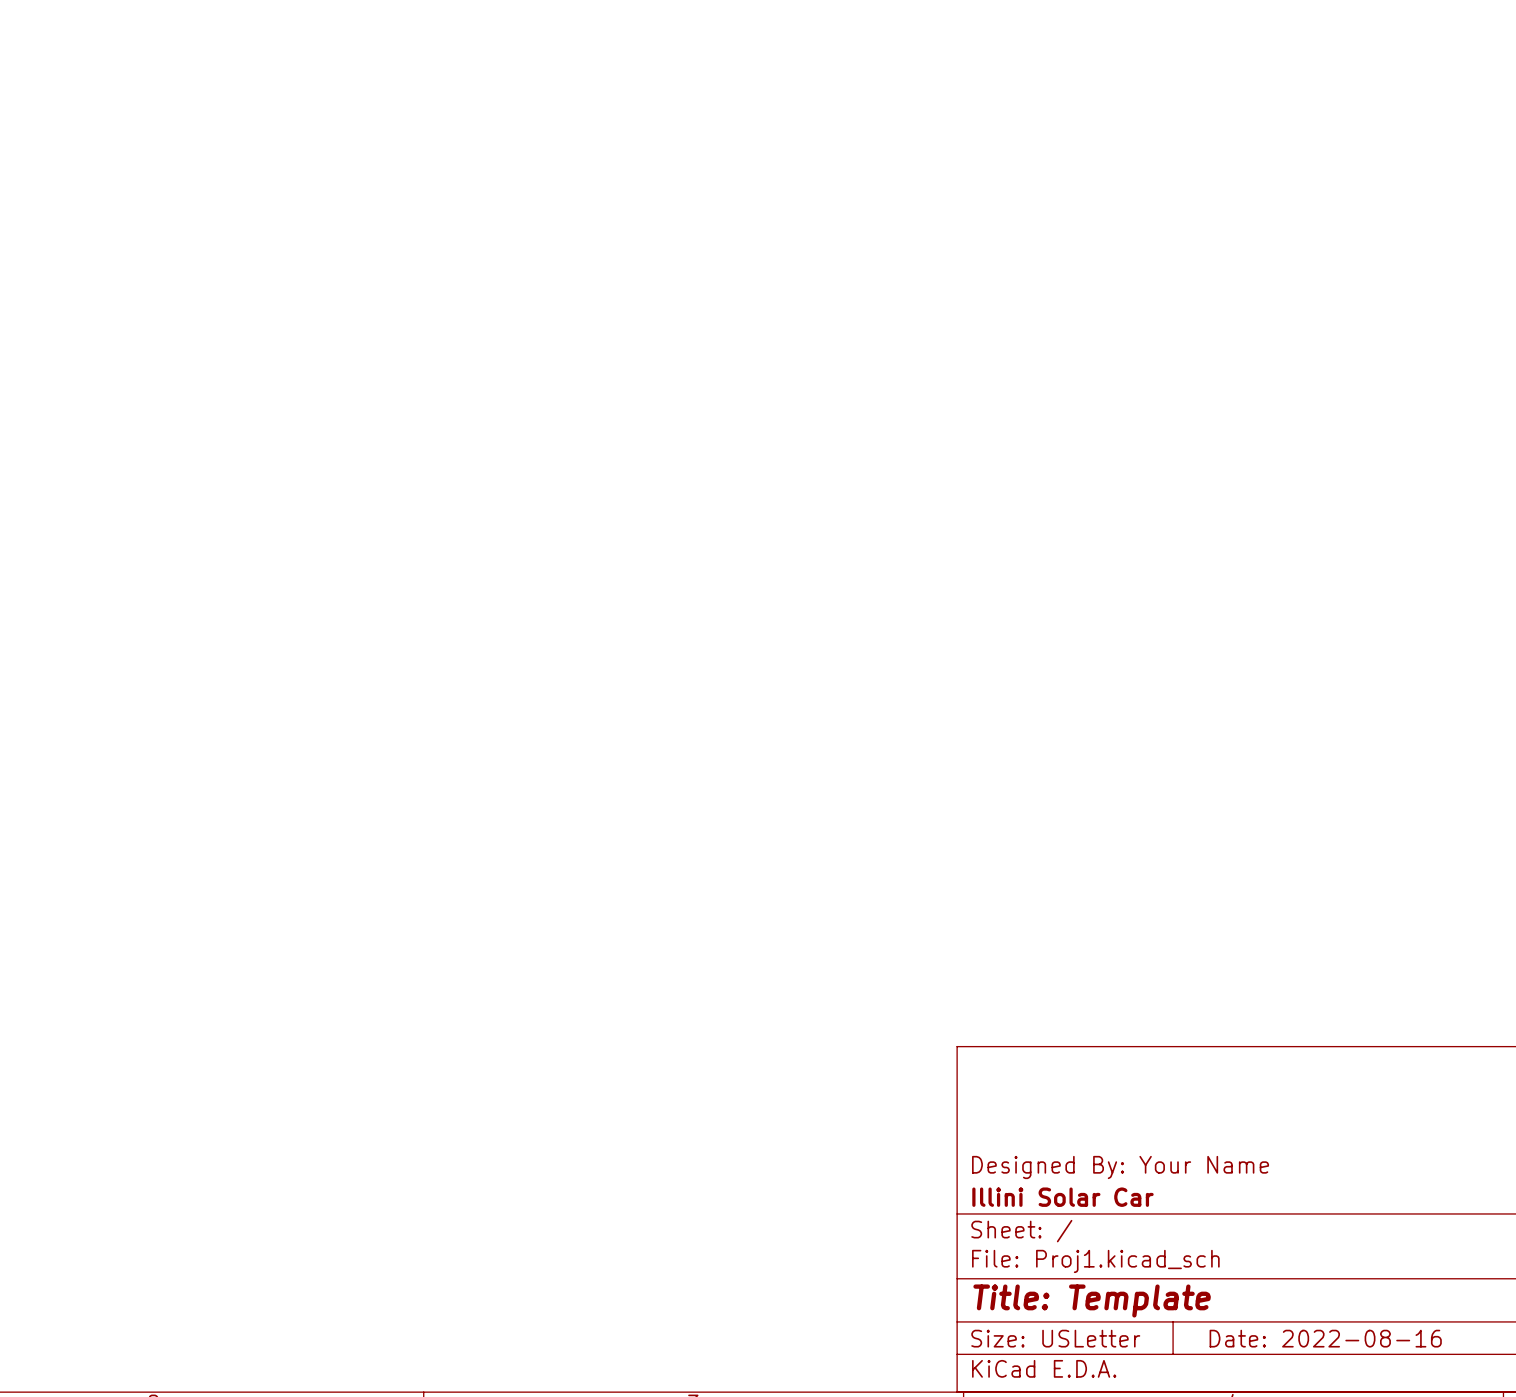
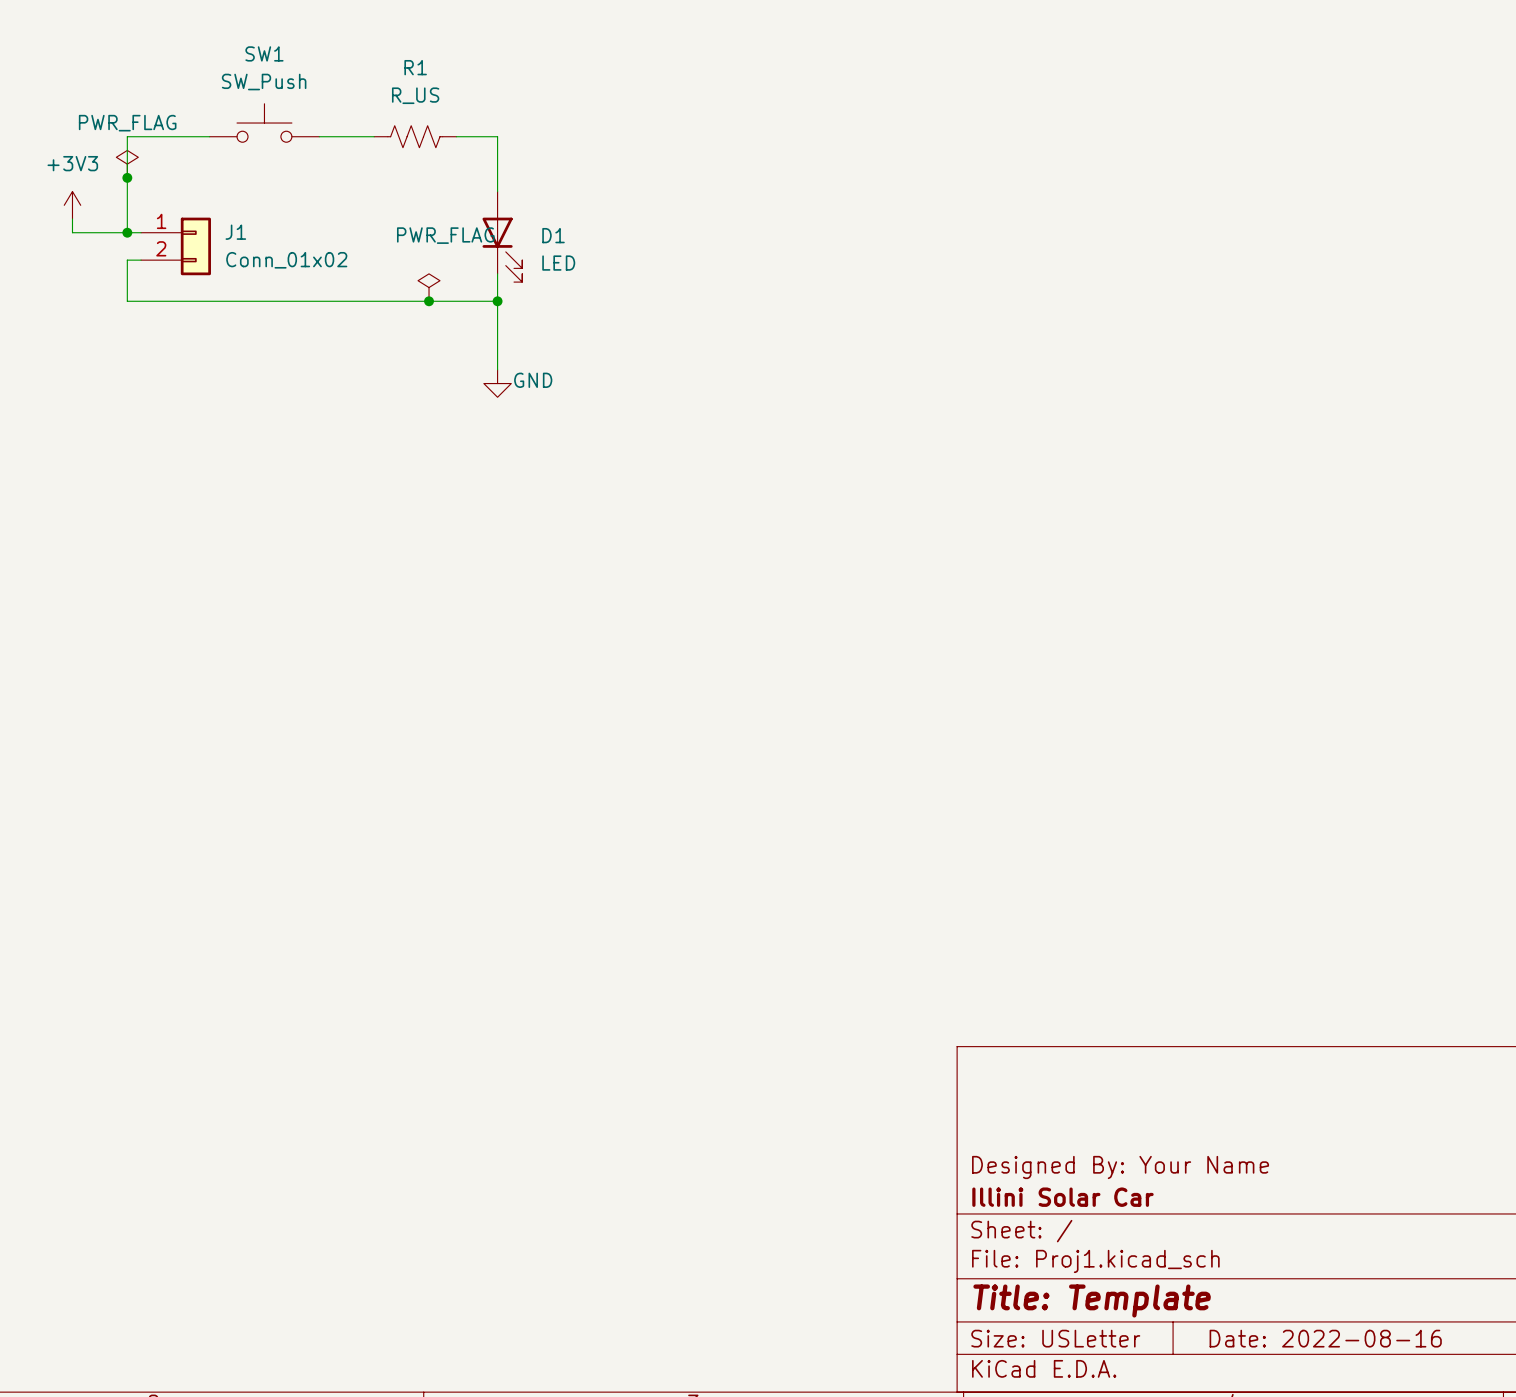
SW1: none -> SW_Push (264, 123)
wire: none -> (209, 136) (127, 136) (127, 232)
wire: none -> (319, 136) (374, 136)
R1: none -> R_US (415, 136)
wire: none -> (456, 136) (497, 136) (497, 191)
power symbol: none -> PWR_FLAG (127, 164)
junction: none -> (127, 177)
power symbol: none -> +3V3 (72, 205)
wire: none -> (72, 219) (72, 232) (141, 232)
junction: none -> (127, 232)
D1: none -> LED (502, 236)
J1: none -> Conn_01x02 (176, 246)
wire: none -> (141, 260) (127, 260) (127, 301) (497, 301)
wire: none -> (497, 273) (497, 369)
power symbol: none -> PWR_FLAG (429, 287)
junction: none -> (429, 301)
junction: none -> (497, 301)
power symbol: none -> GND (497, 383)

